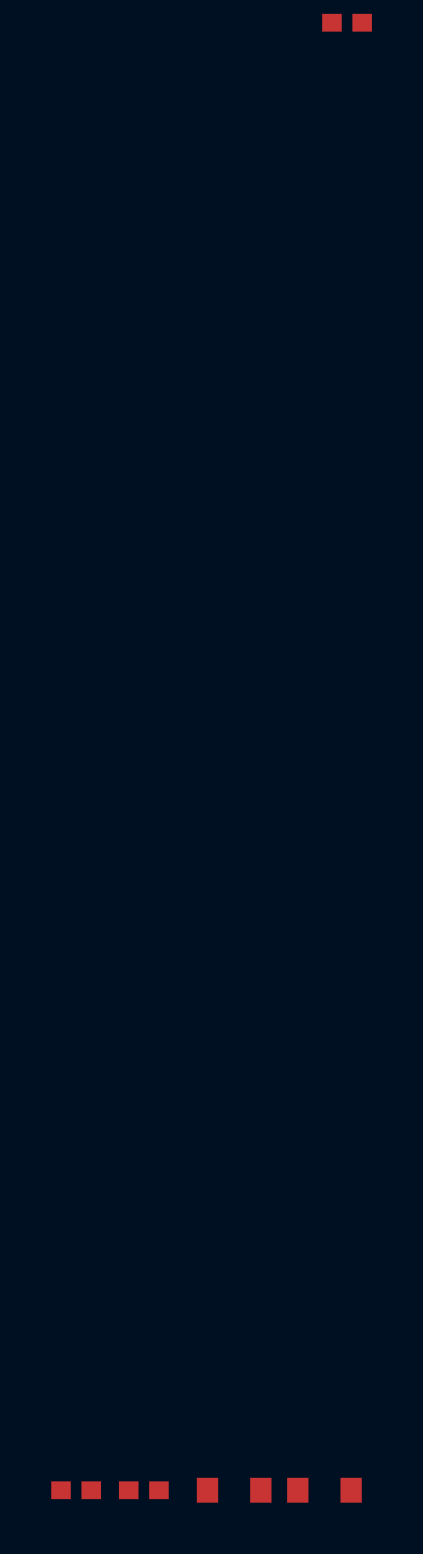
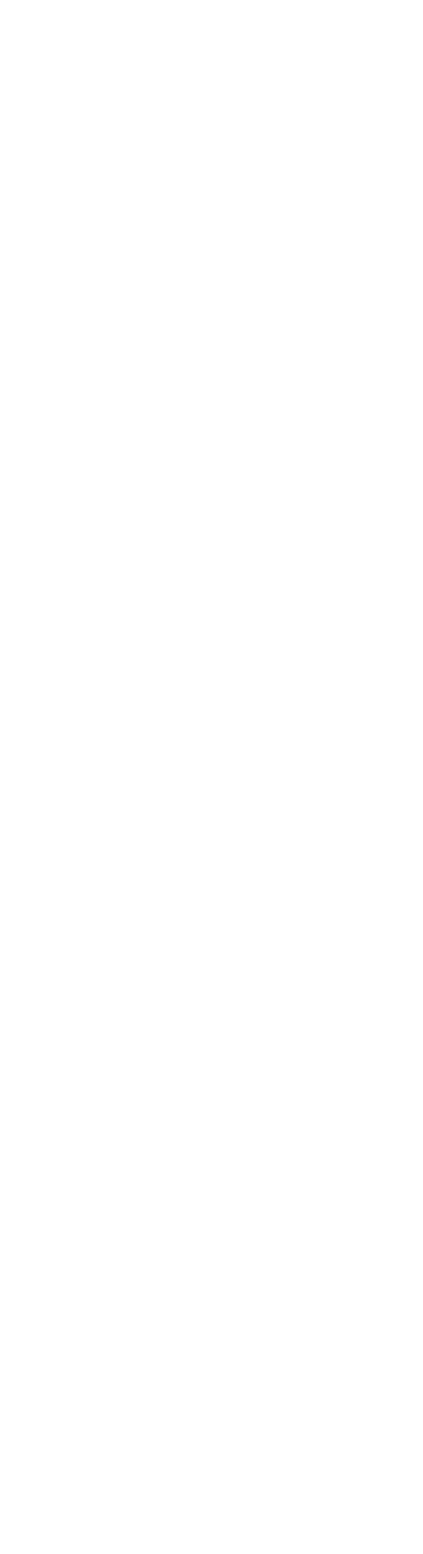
part: (347, 22) -> none
part: (76, 1490) -> none
part: (143, 1490) -> none
part: (234, 1490) -> none
part: (324, 1490) -> none

